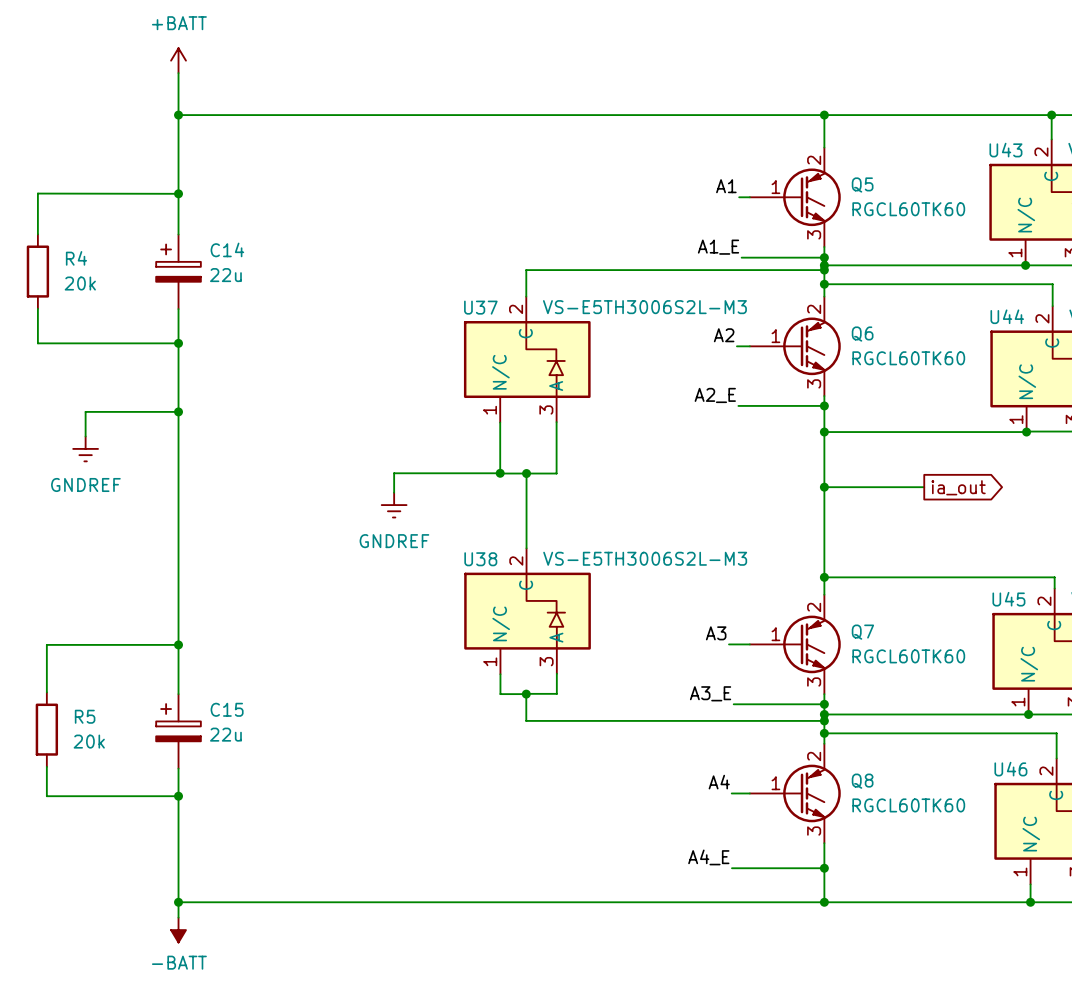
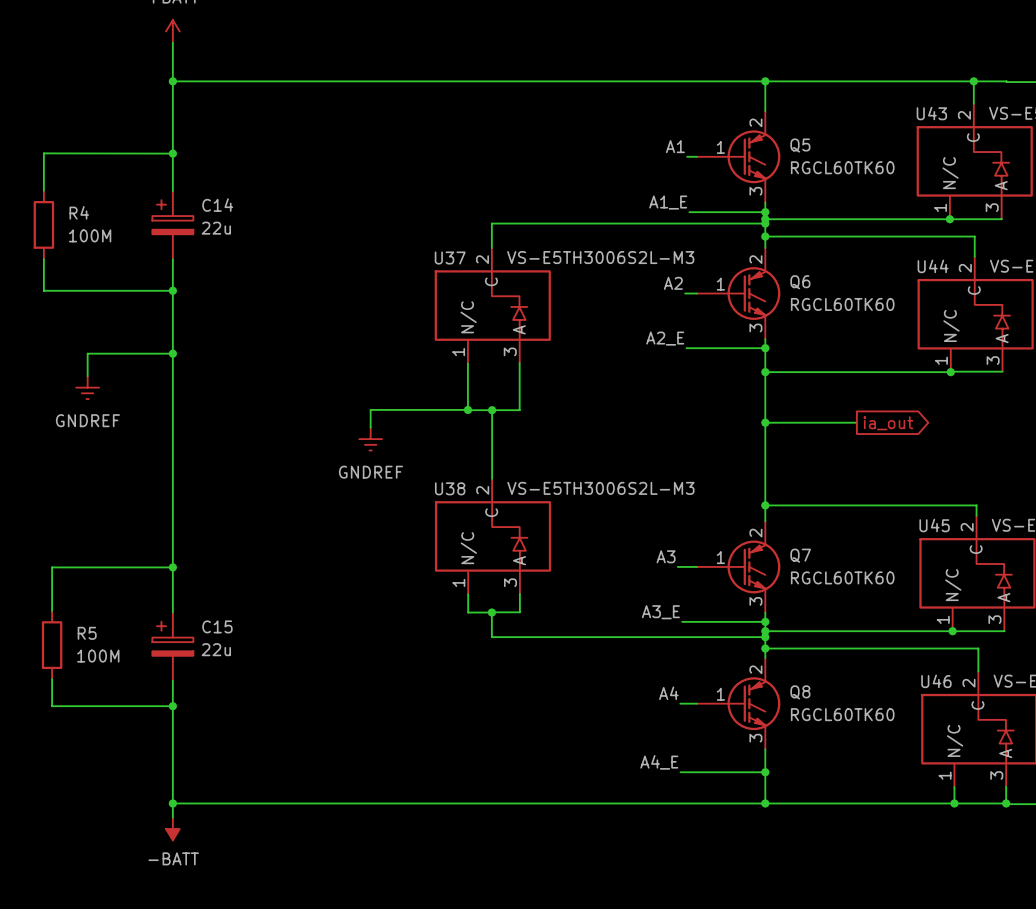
R4 value: 20k (80, 283) -> 100M (90, 235)
R5 value: 20k (89, 741) -> 100M (98, 656)

